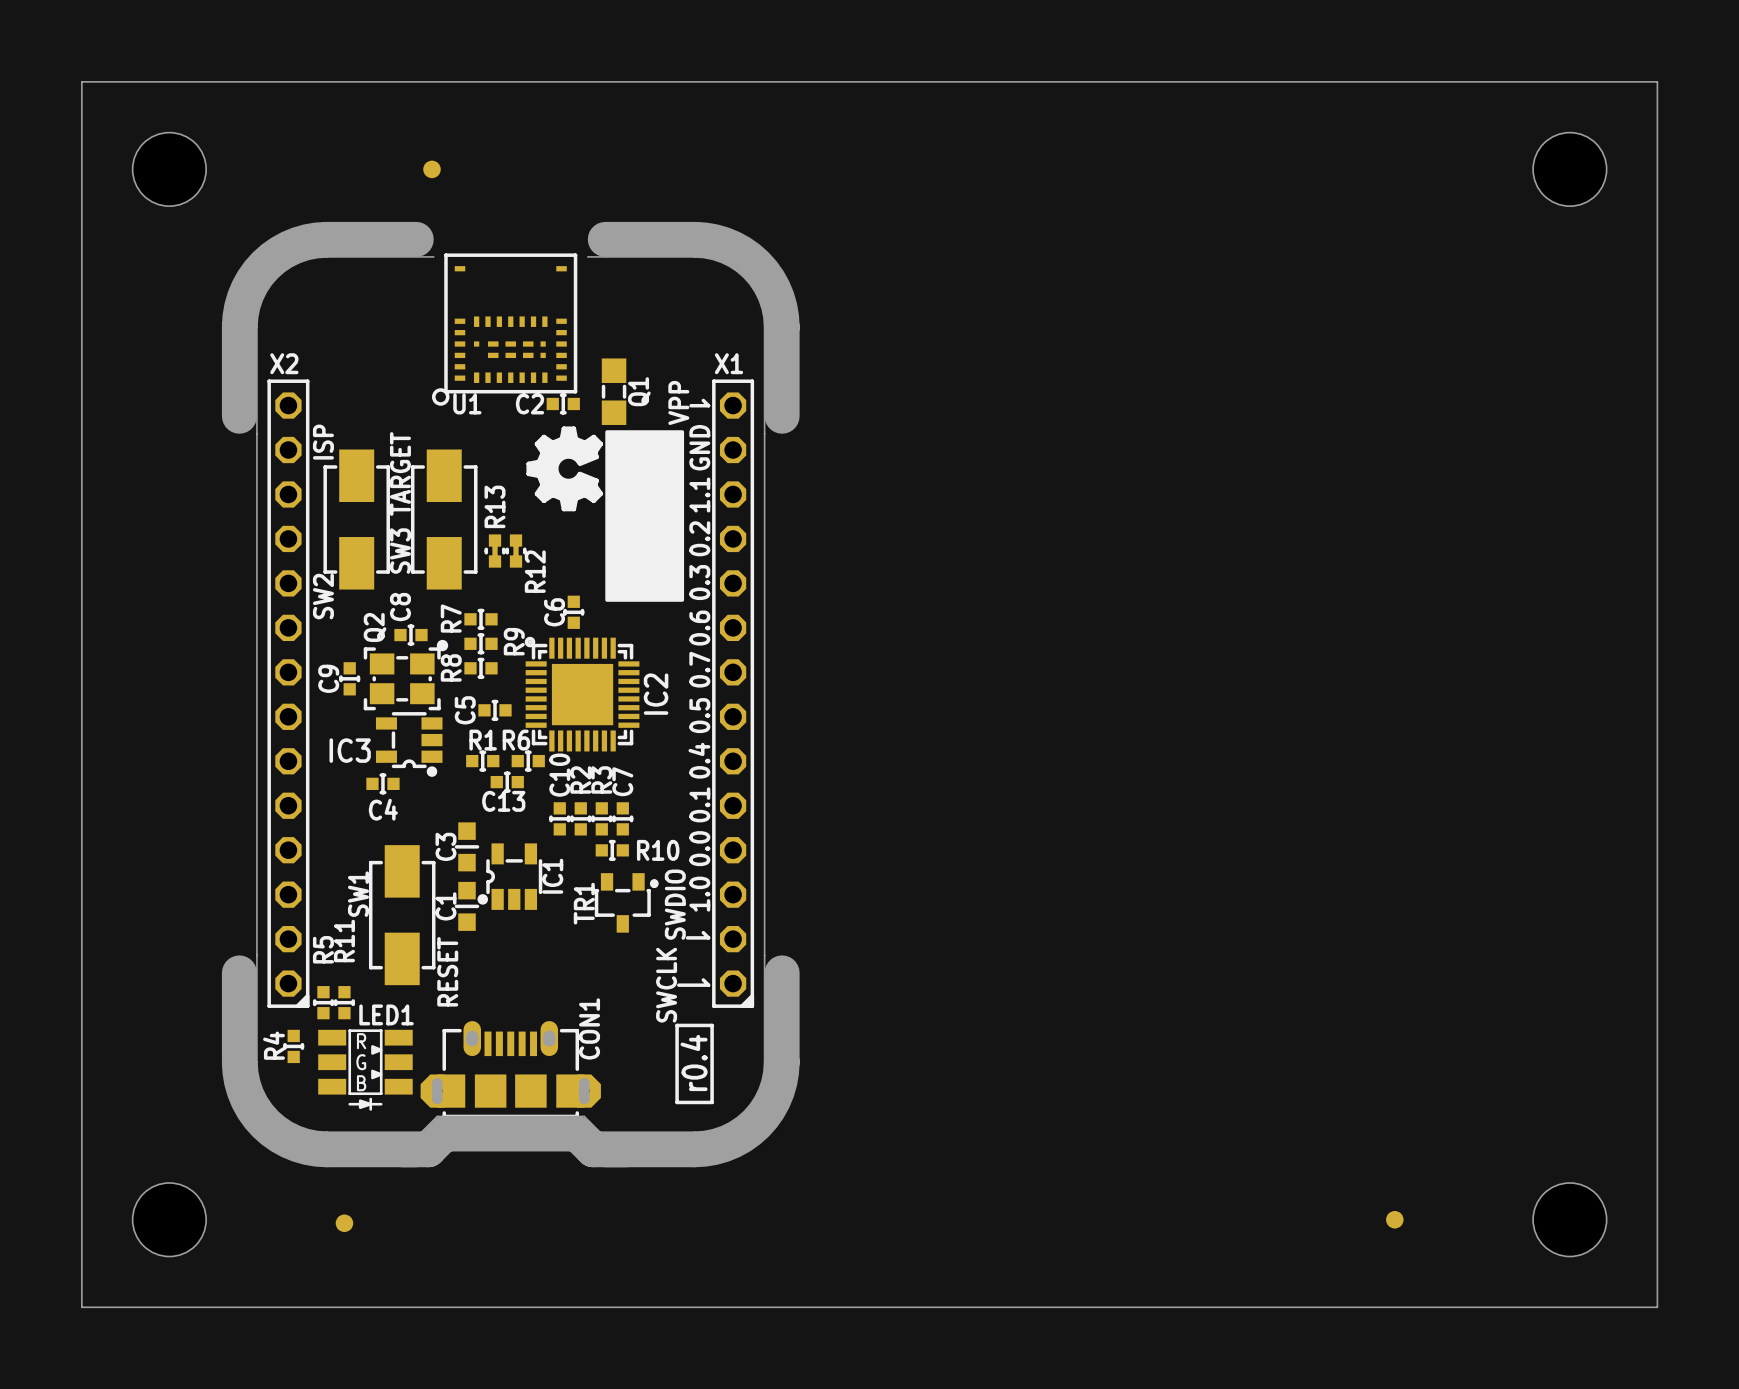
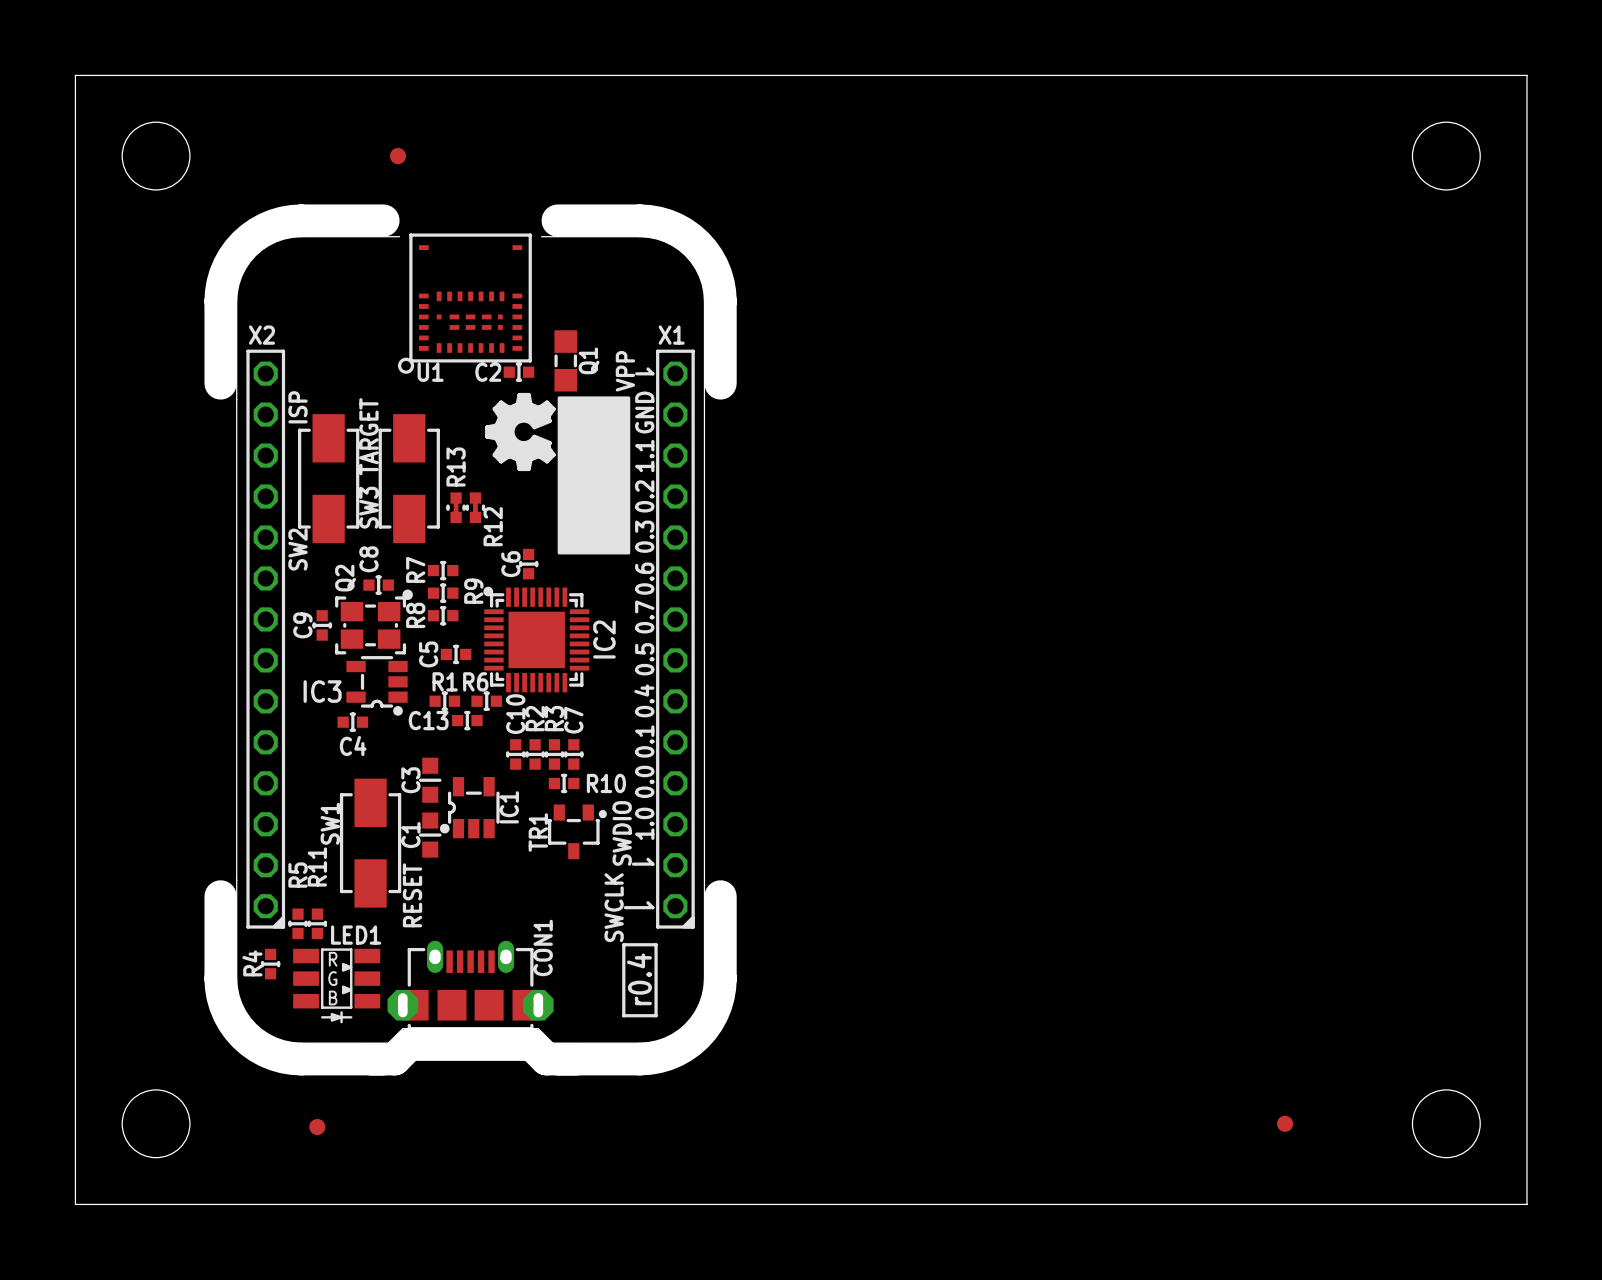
C13 name position: C13 (503, 801) -> C13 (428, 720)

